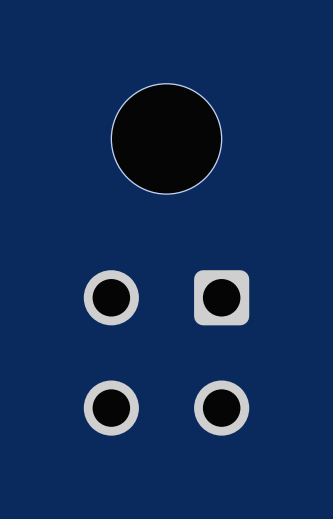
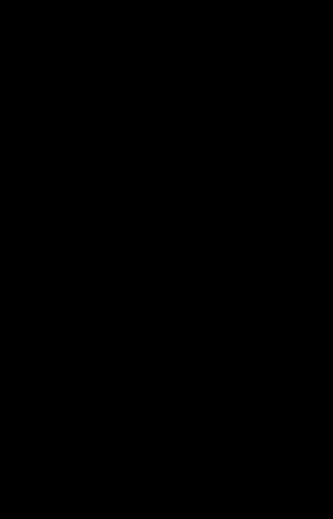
part: (166, 259) -> none

